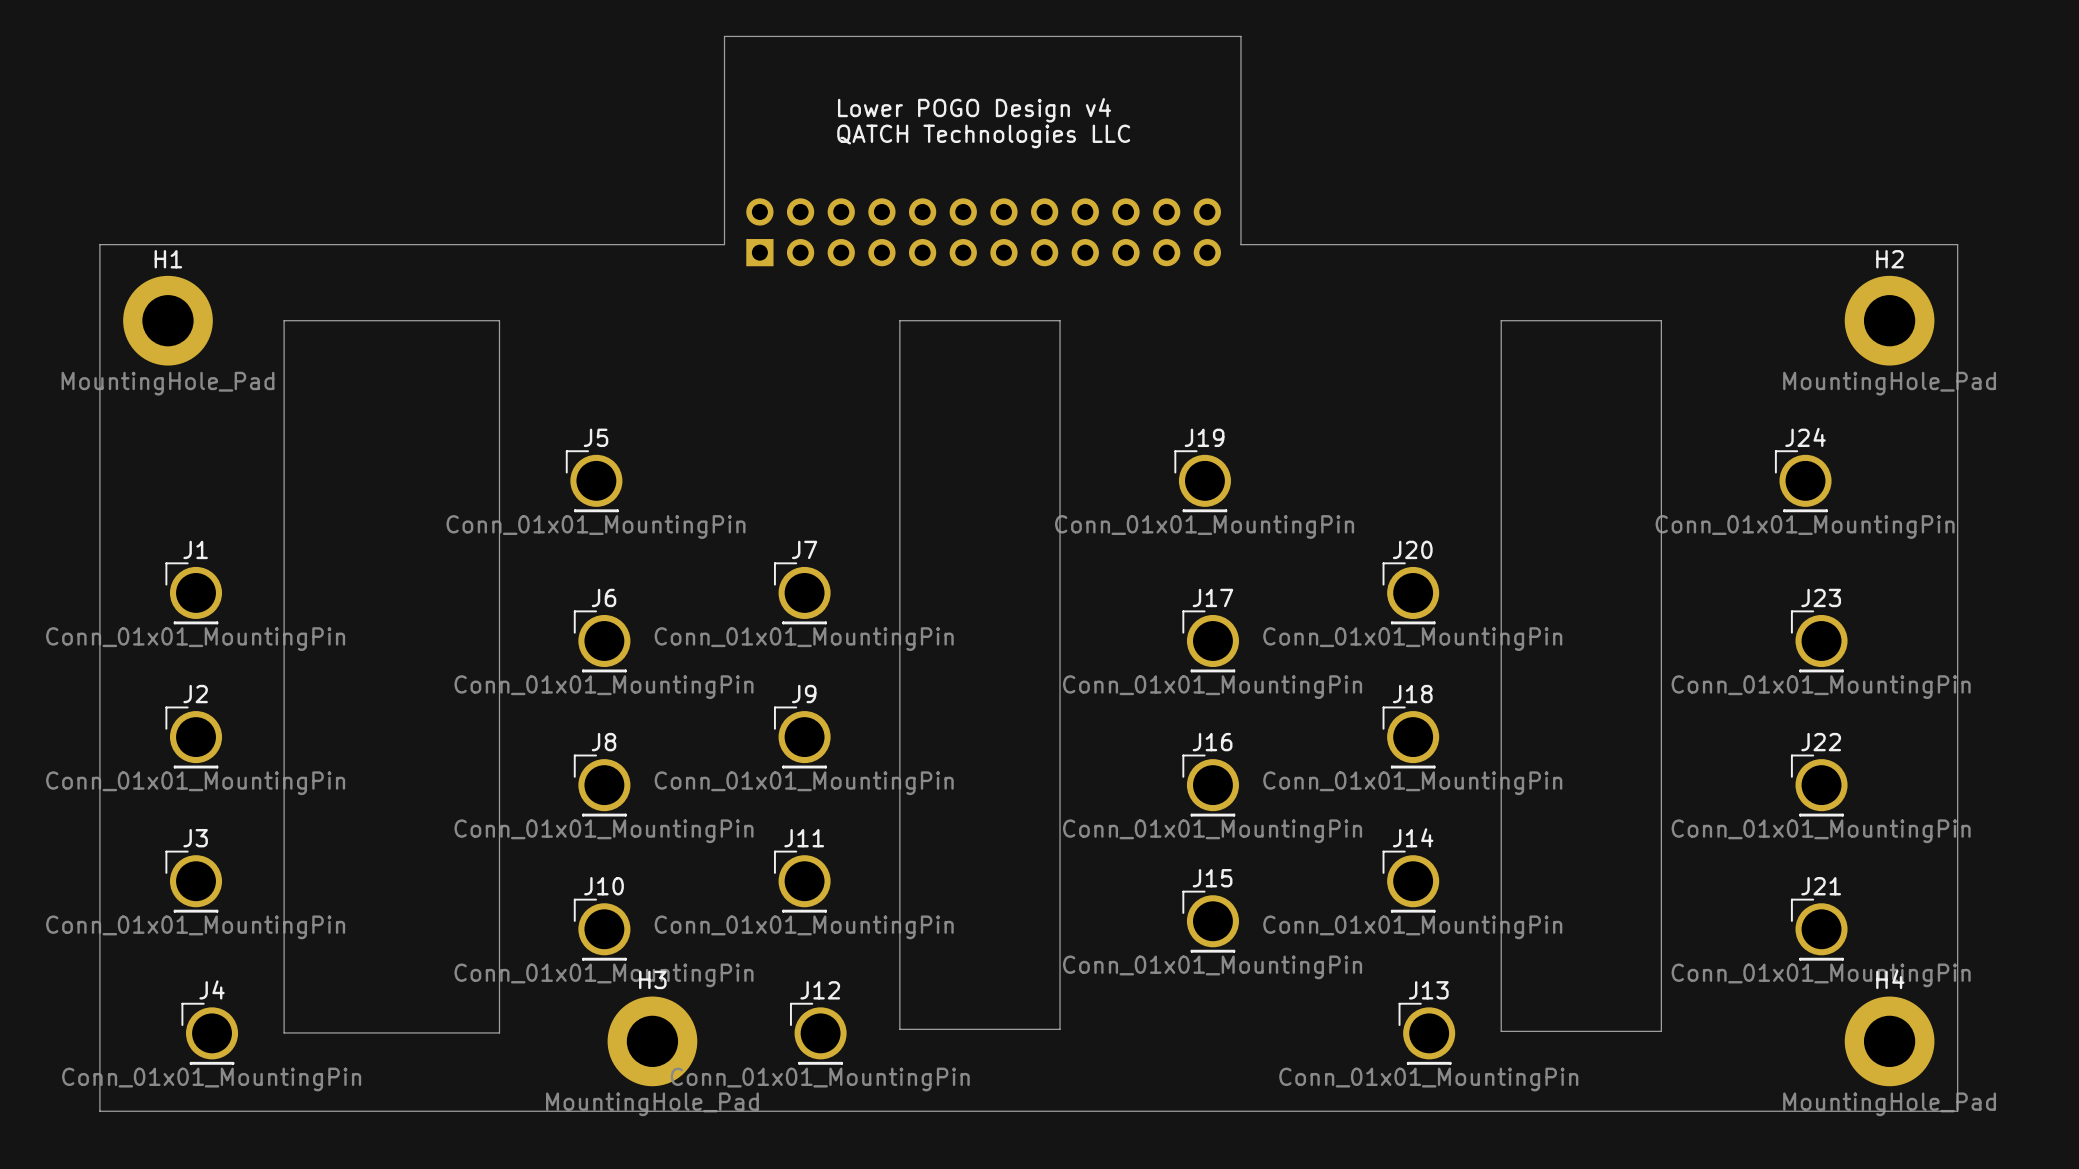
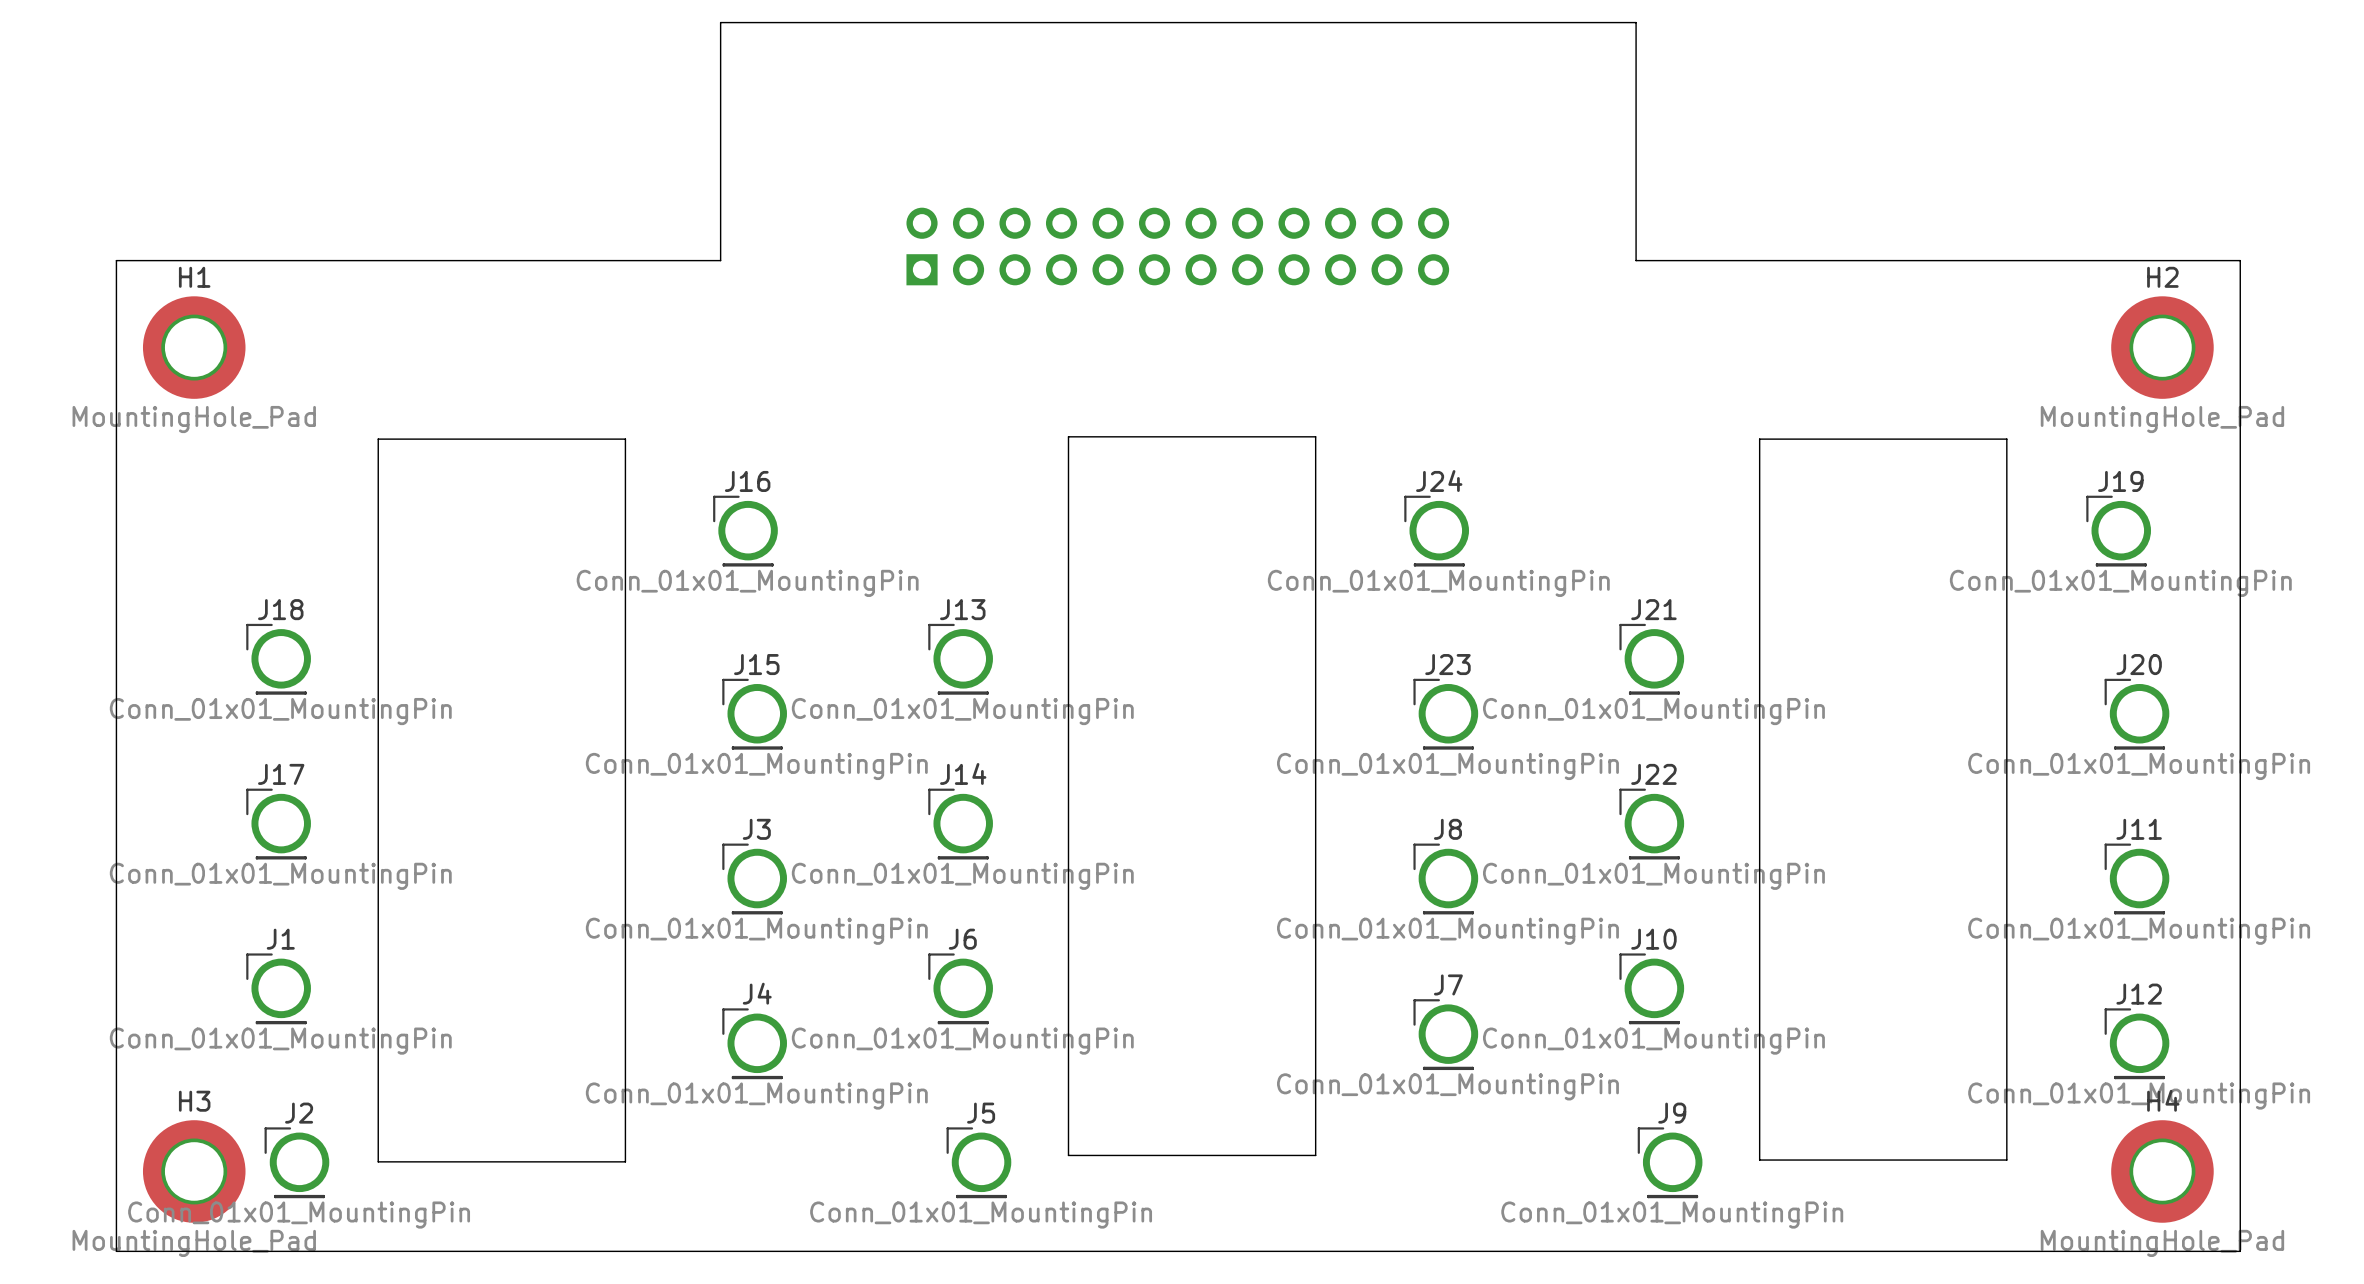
board edge: (724, 36) (724, 244) (628, 244) -> (830, 22) (720, 22) (720, 260)
board edge: (1240, 36) (1240, 244) (1429, 244) -> (1420, 22) (1636, 22) (1636, 260)
text: Lower POGO Design v4 (974, 110) -> none
text: QATCH Technologies LLC (983, 136) -> none
part position: (983, 232) -> (1177, 246)
board edge: (899, 320) (1060, 320) (1060, 1029) (899, 1029) (899, 320) -> none
board edge: none -> (1068, 436) (1315, 436) (1315, 1155) (1068, 1155) (1068, 436)
J5 position: (594, 481) -> (978, 1162)
J19 position: (1202, 481) -> (2118, 531)
J24 position: (1803, 481) -> (1436, 531)
J1 position: (193, 593) -> (278, 988)
J7 position: (802, 593) -> (1445, 1034)
J20 position: (1410, 593) -> (2136, 714)
J6 position: (602, 641) -> (960, 988)
J17 position: (1210, 641) -> (278, 824)
J23 position: (1819, 641) -> (1445, 714)
J2 position: (193, 737) -> (296, 1162)
J9 position: (802, 737) -> (1670, 1162)
J18 position: (1410, 737) -> (278, 659)
J8 position: (602, 785) -> (1445, 878)
J16 position: (1210, 785) -> (745, 531)
J22 position: (1819, 785) -> (1651, 824)
J3 position: (193, 881) -> (754, 878)
J11 position: (802, 881) -> (2136, 878)
J14 position: (1410, 881) -> (960, 824)
J15 position: (1210, 921) -> (754, 714)
J10 position: (602, 929) -> (1651, 988)
J21 position: (1819, 929) -> (1651, 659)
board edge: (1537, 1031) (1501, 1031) (1501, 320) (1661, 320) (1661, 1031) -> (1759, 1160) (1759, 439) (2006, 439) (2006, 1160) (1901, 1160)
board edge: (328, 1032) (284, 1032) (284, 320) (499, 320) (499, 1032) -> (378, 1161) (378, 439) (625, 439) (625, 1161) (573, 1161)
J4 position: (209, 1033) -> (754, 1043)
J12 position: (818, 1033) -> (2136, 1043)
J13 position: (1426, 1033) -> (960, 659)
H3 position: (652, 1041) -> (194, 1171)

